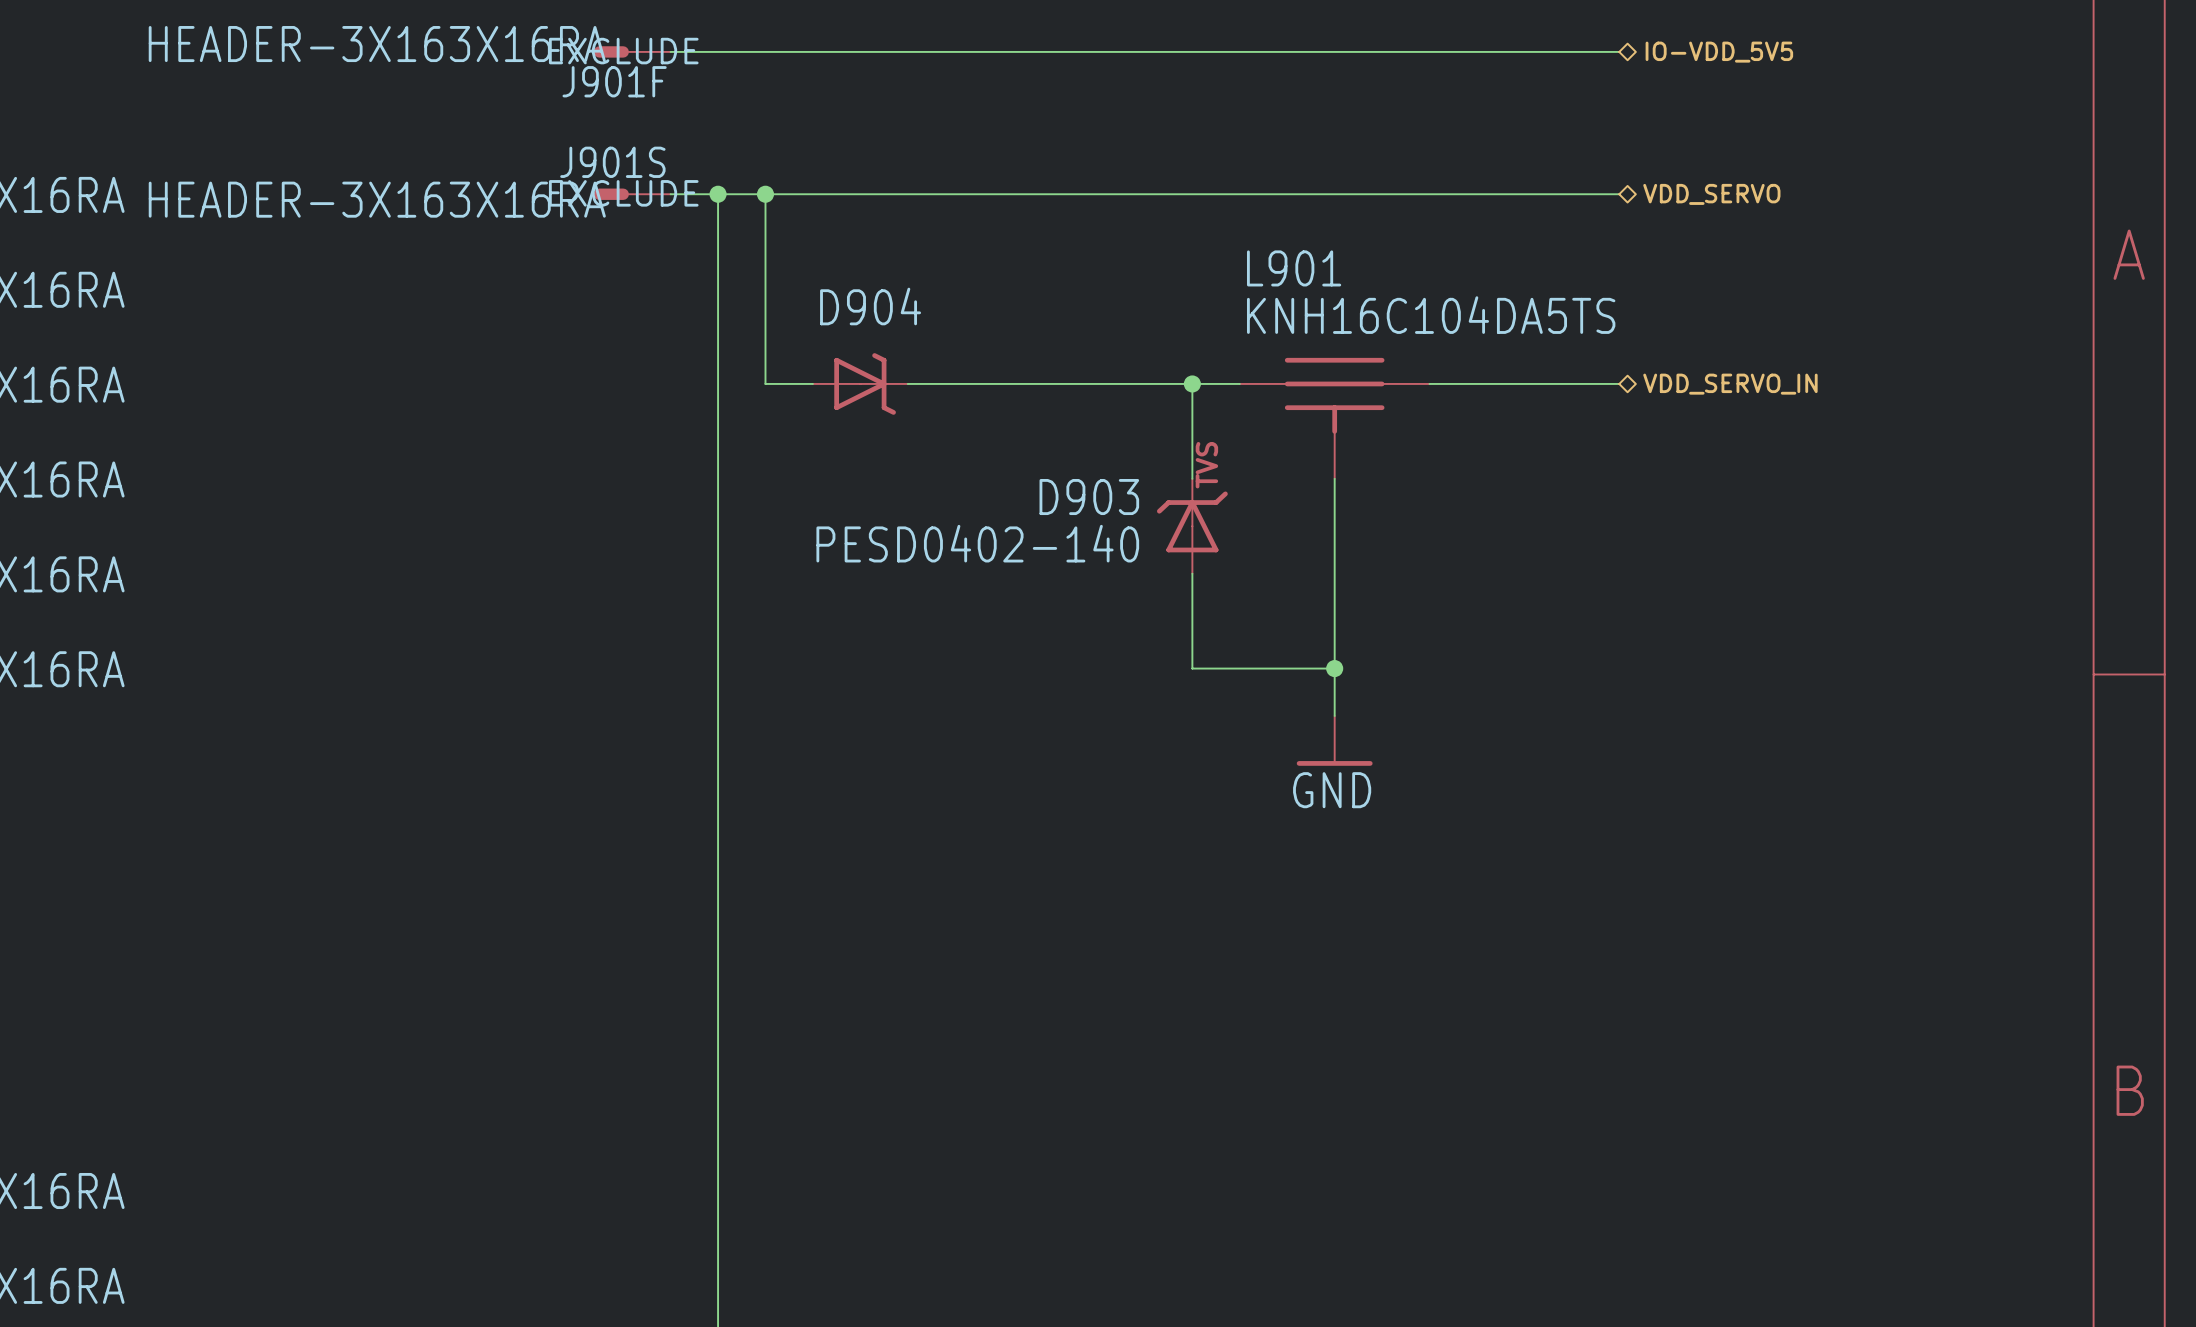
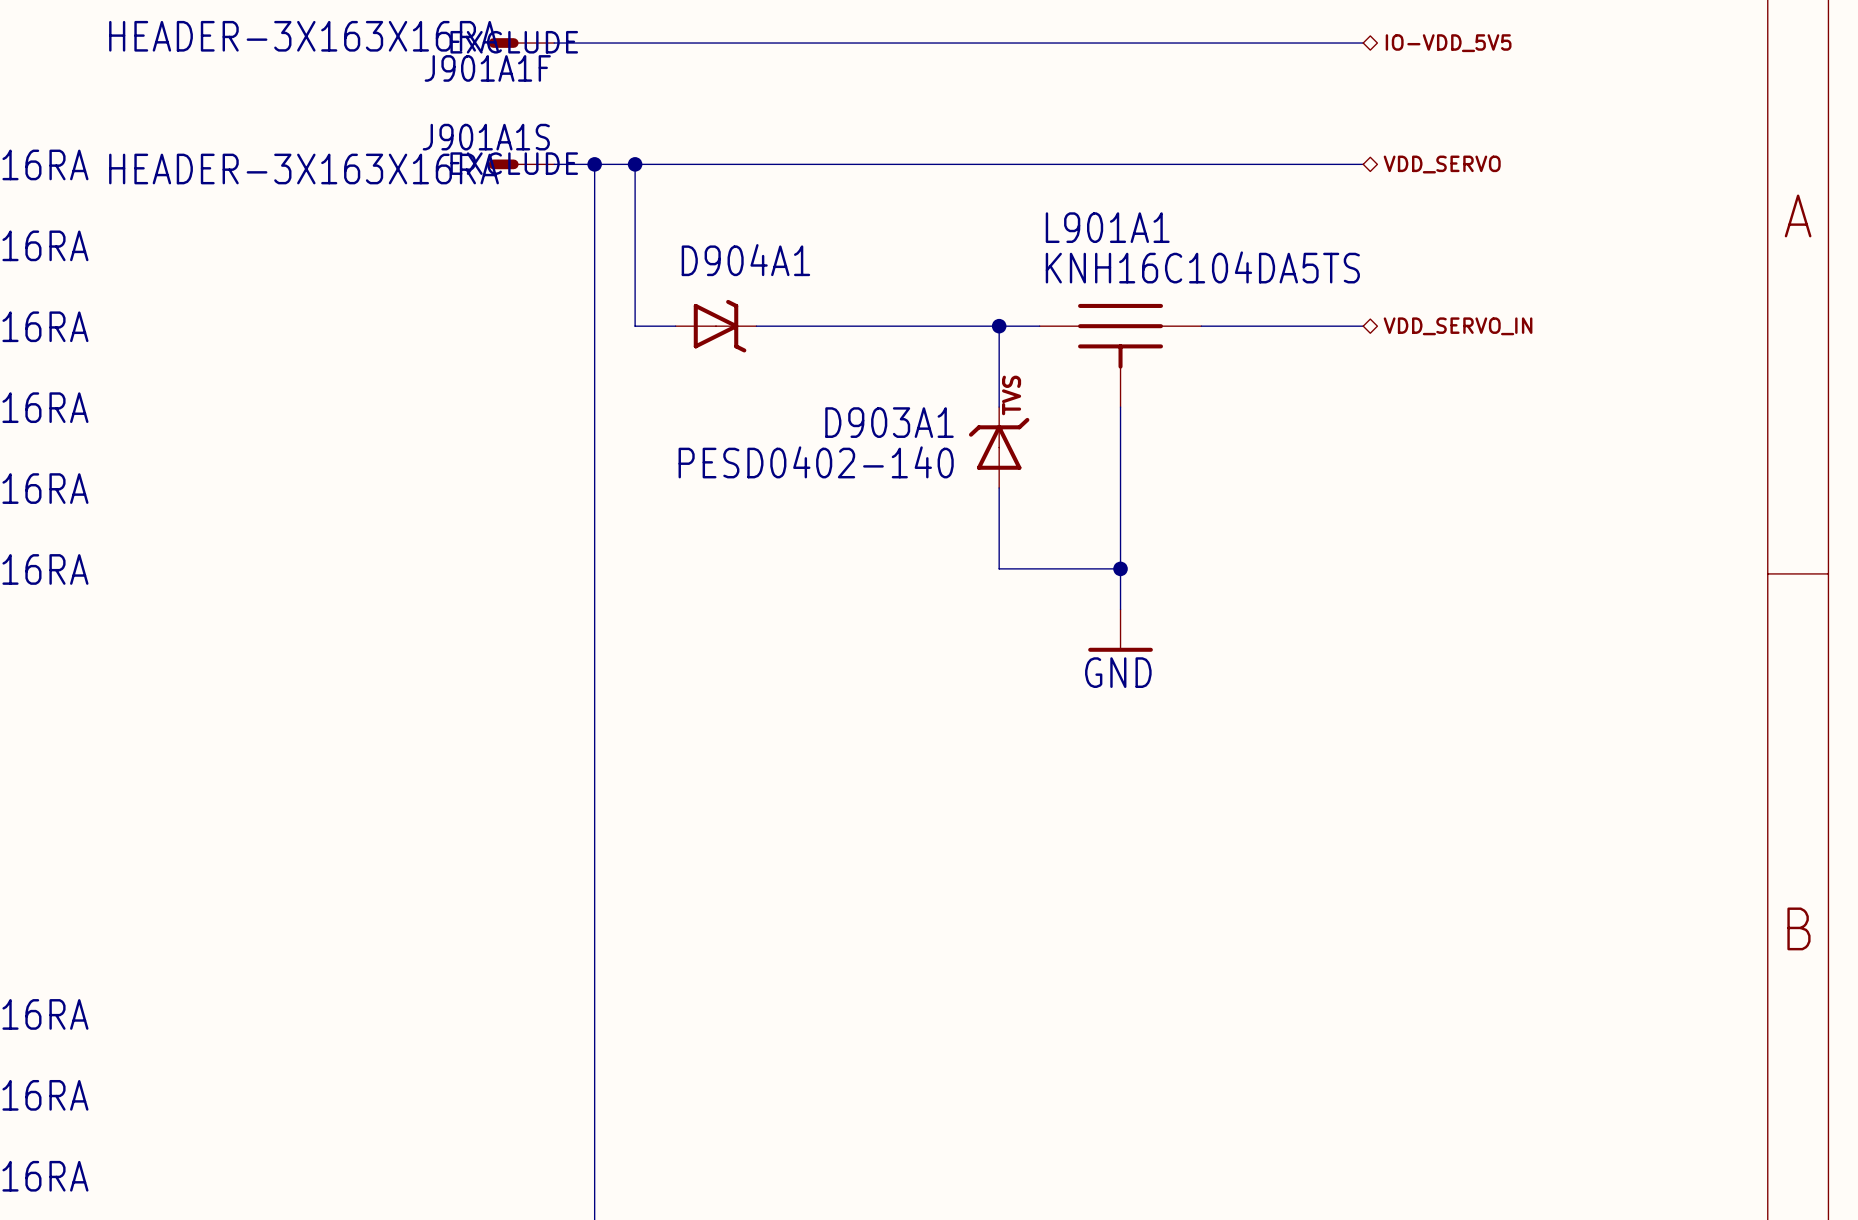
J901F name: J901F (614, 81) -> J901A1F (487, 68)
J901S name: J901S (612, 162) -> J901A1S (486, 137)
L901 name: L901 (1294, 268) -> L901A1 (1107, 227)
D904 name: D904 (870, 306) -> D904A1 (745, 260)
D903 name: D903 (1089, 497) -> D903A1 (889, 422)

